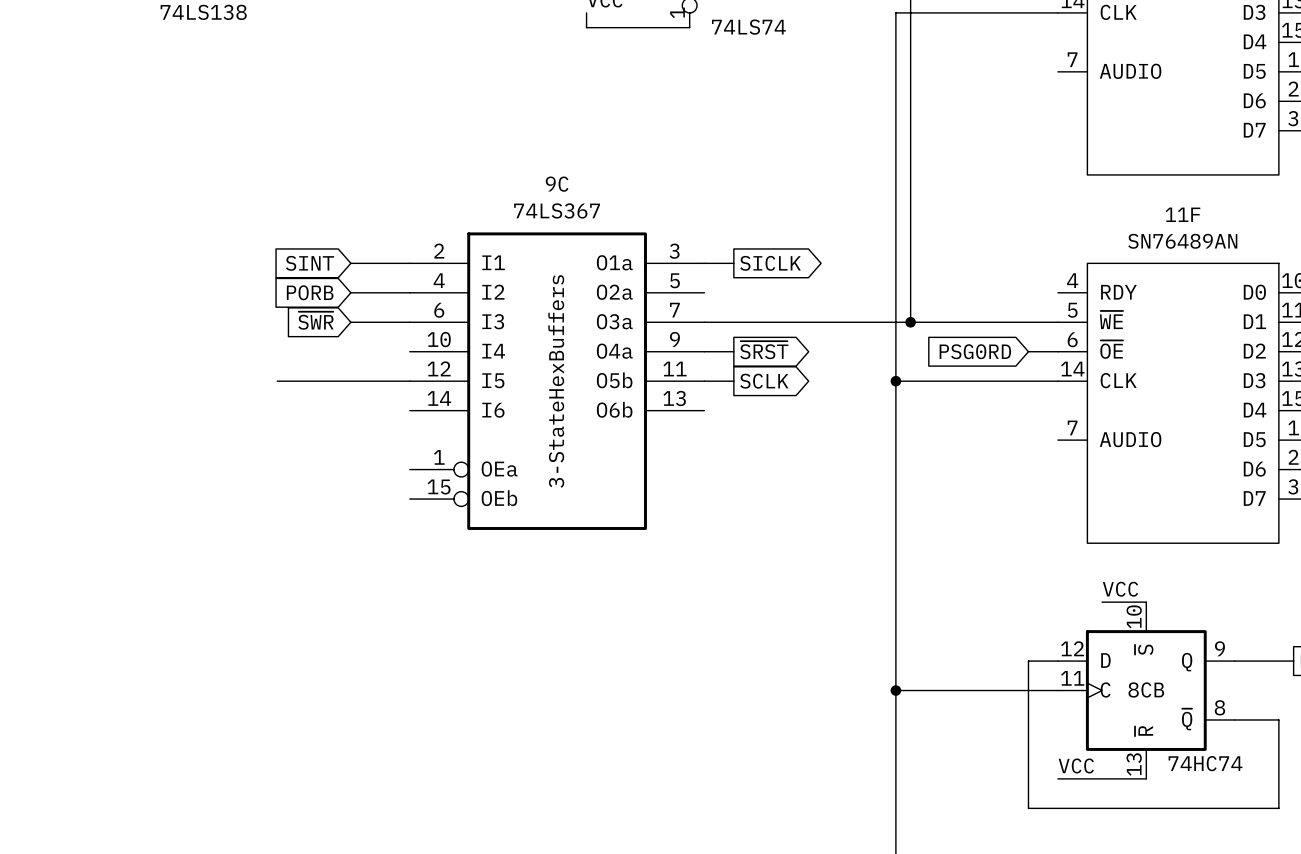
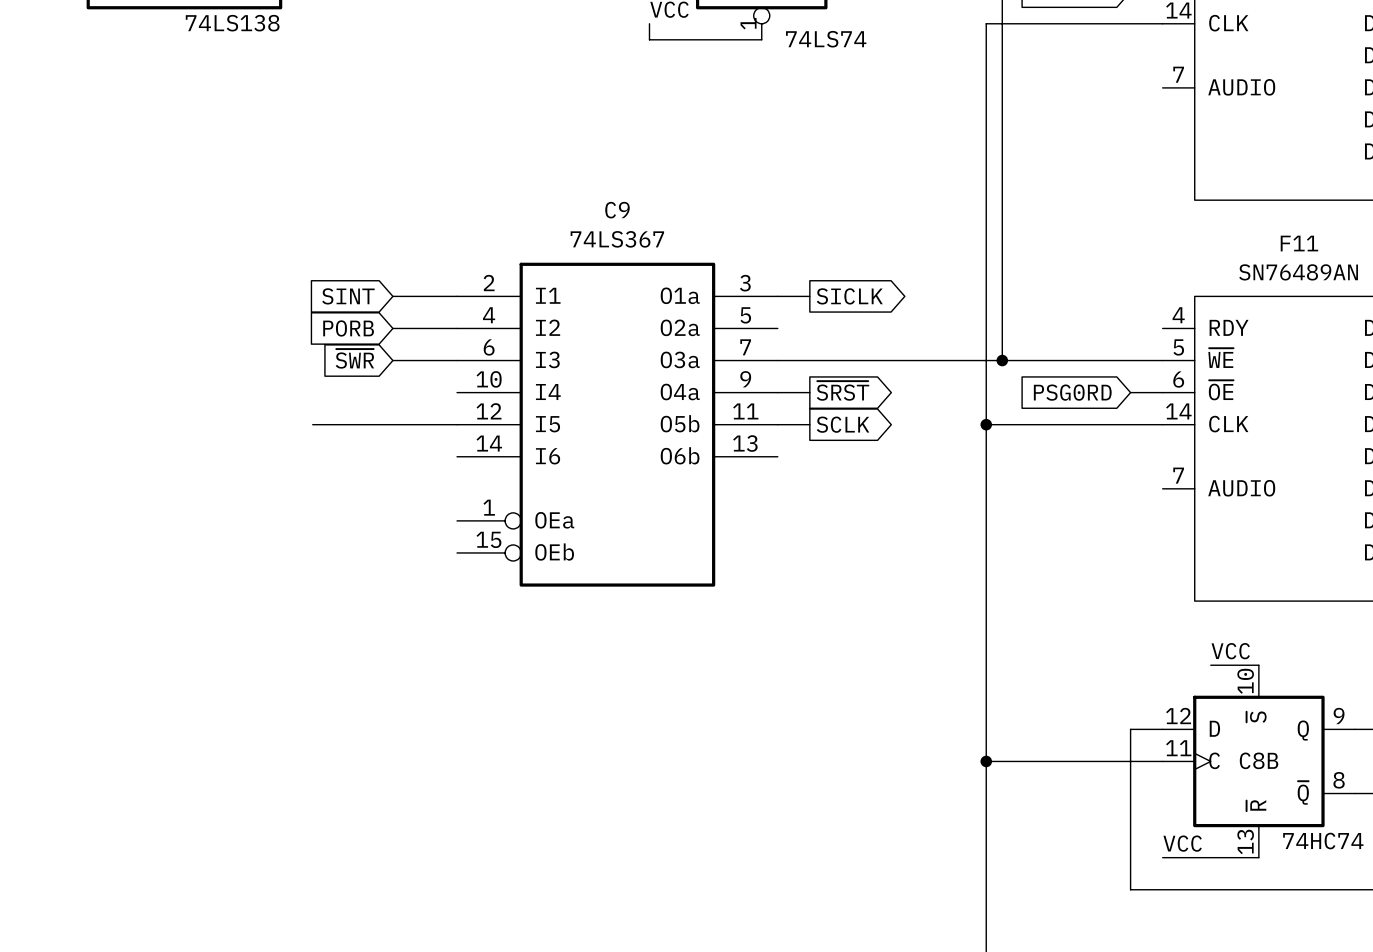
9C name: 9C (557, 184) -> C9 (617, 210)
11F name: 11F (1182, 214) -> F11 (1299, 243)
9C text: 3-StateHexBuffers (556, 381) -> none
8CB name: 8CB (1146, 689) -> C8B (1259, 760)

